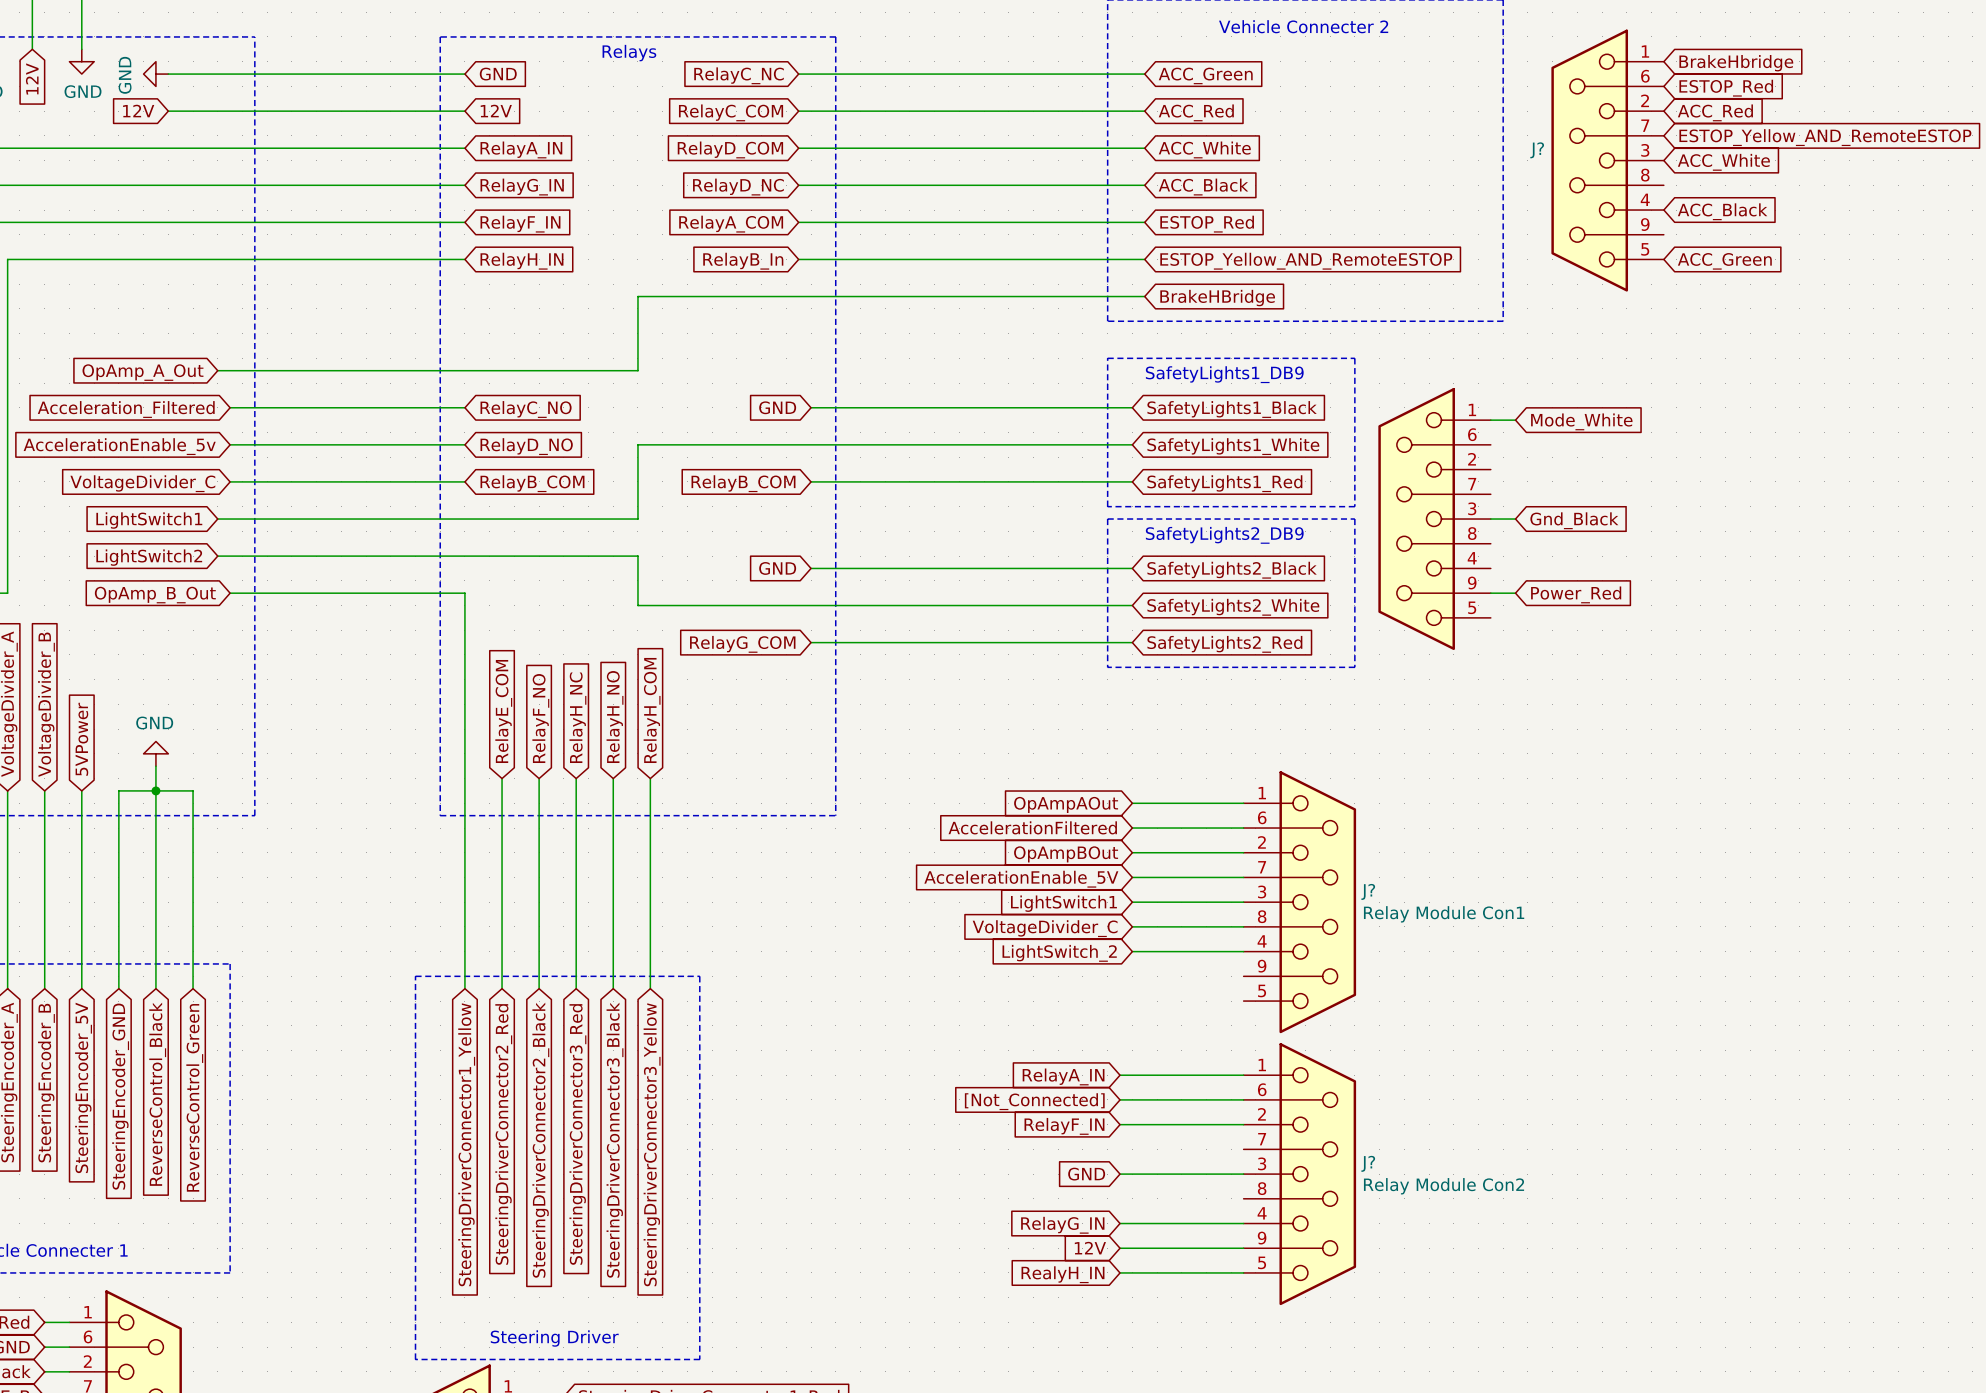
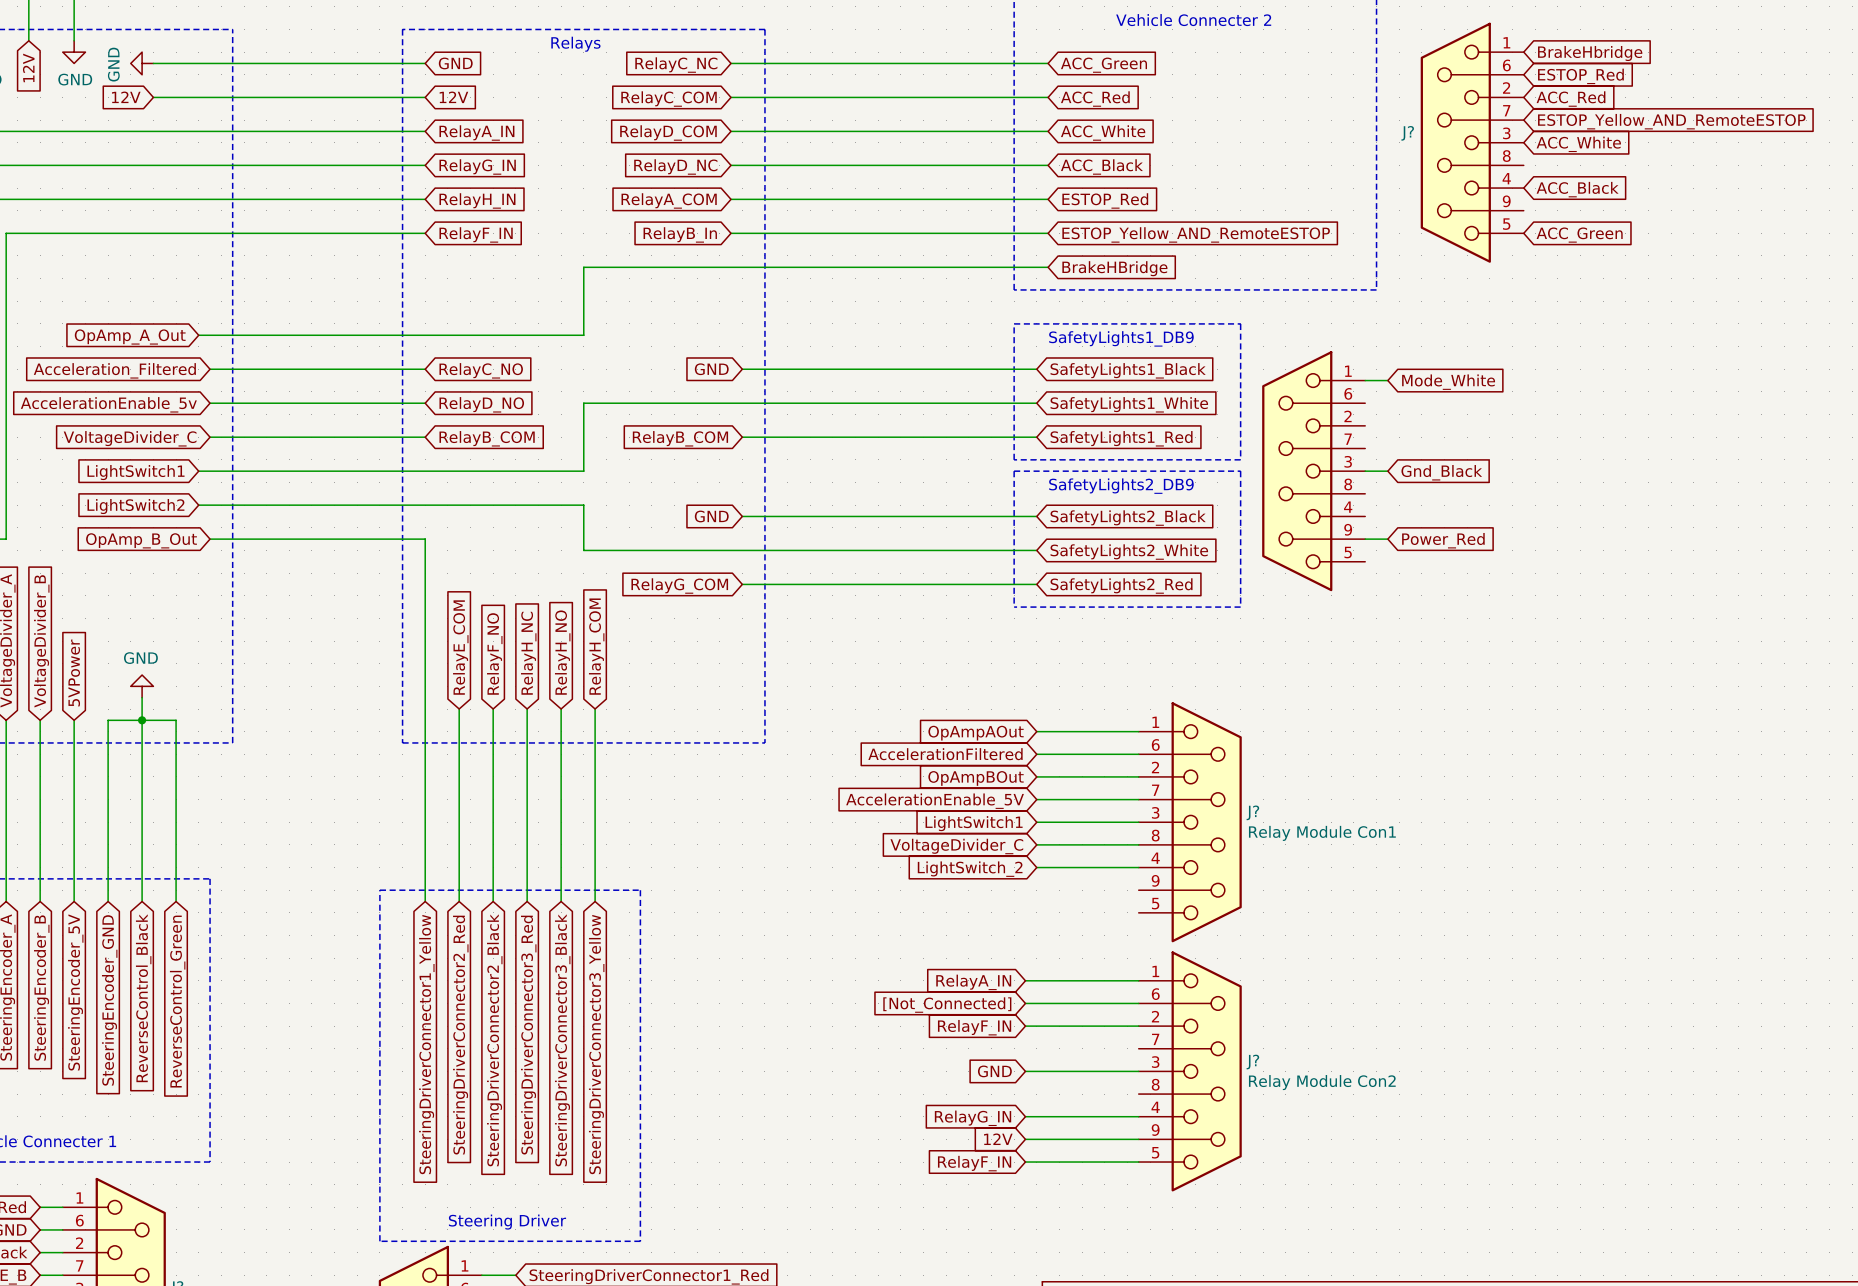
global label: RelayF_IN (520, 224) -> RelayH_IN (477, 200)
global label: RelayH_IN (521, 261) -> RelayF_IN (476, 234)
global label: RealyH_IN (1062, 1274) -> RelayF_IN (974, 1163)

